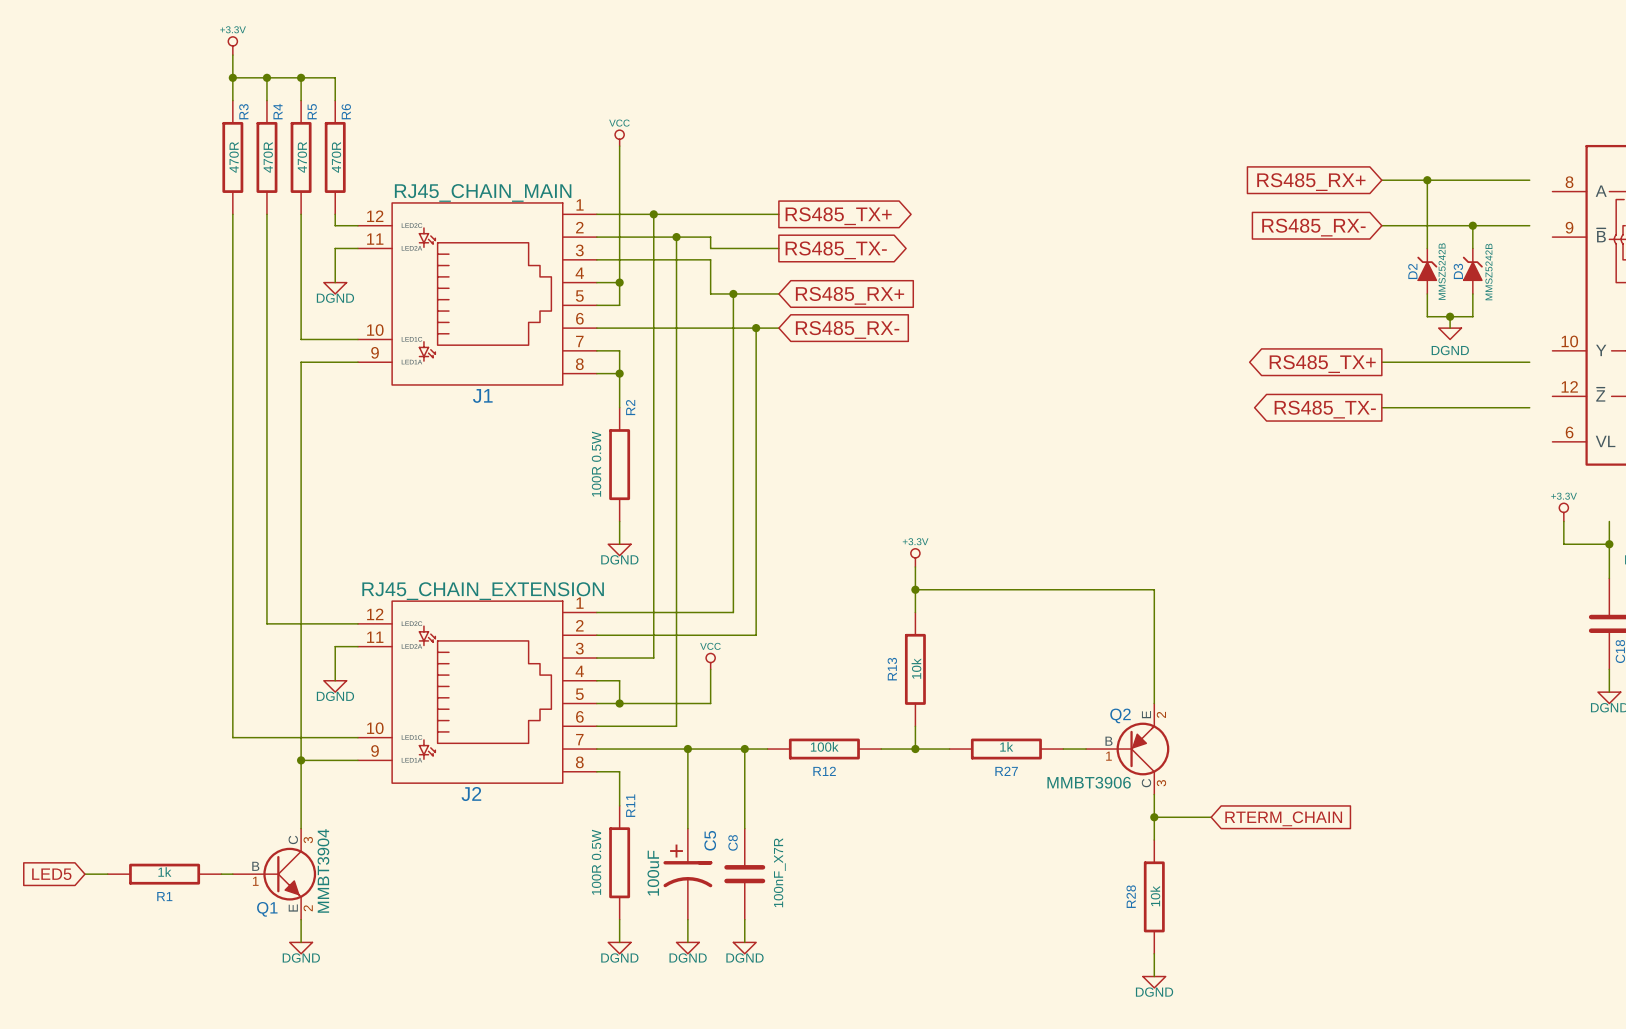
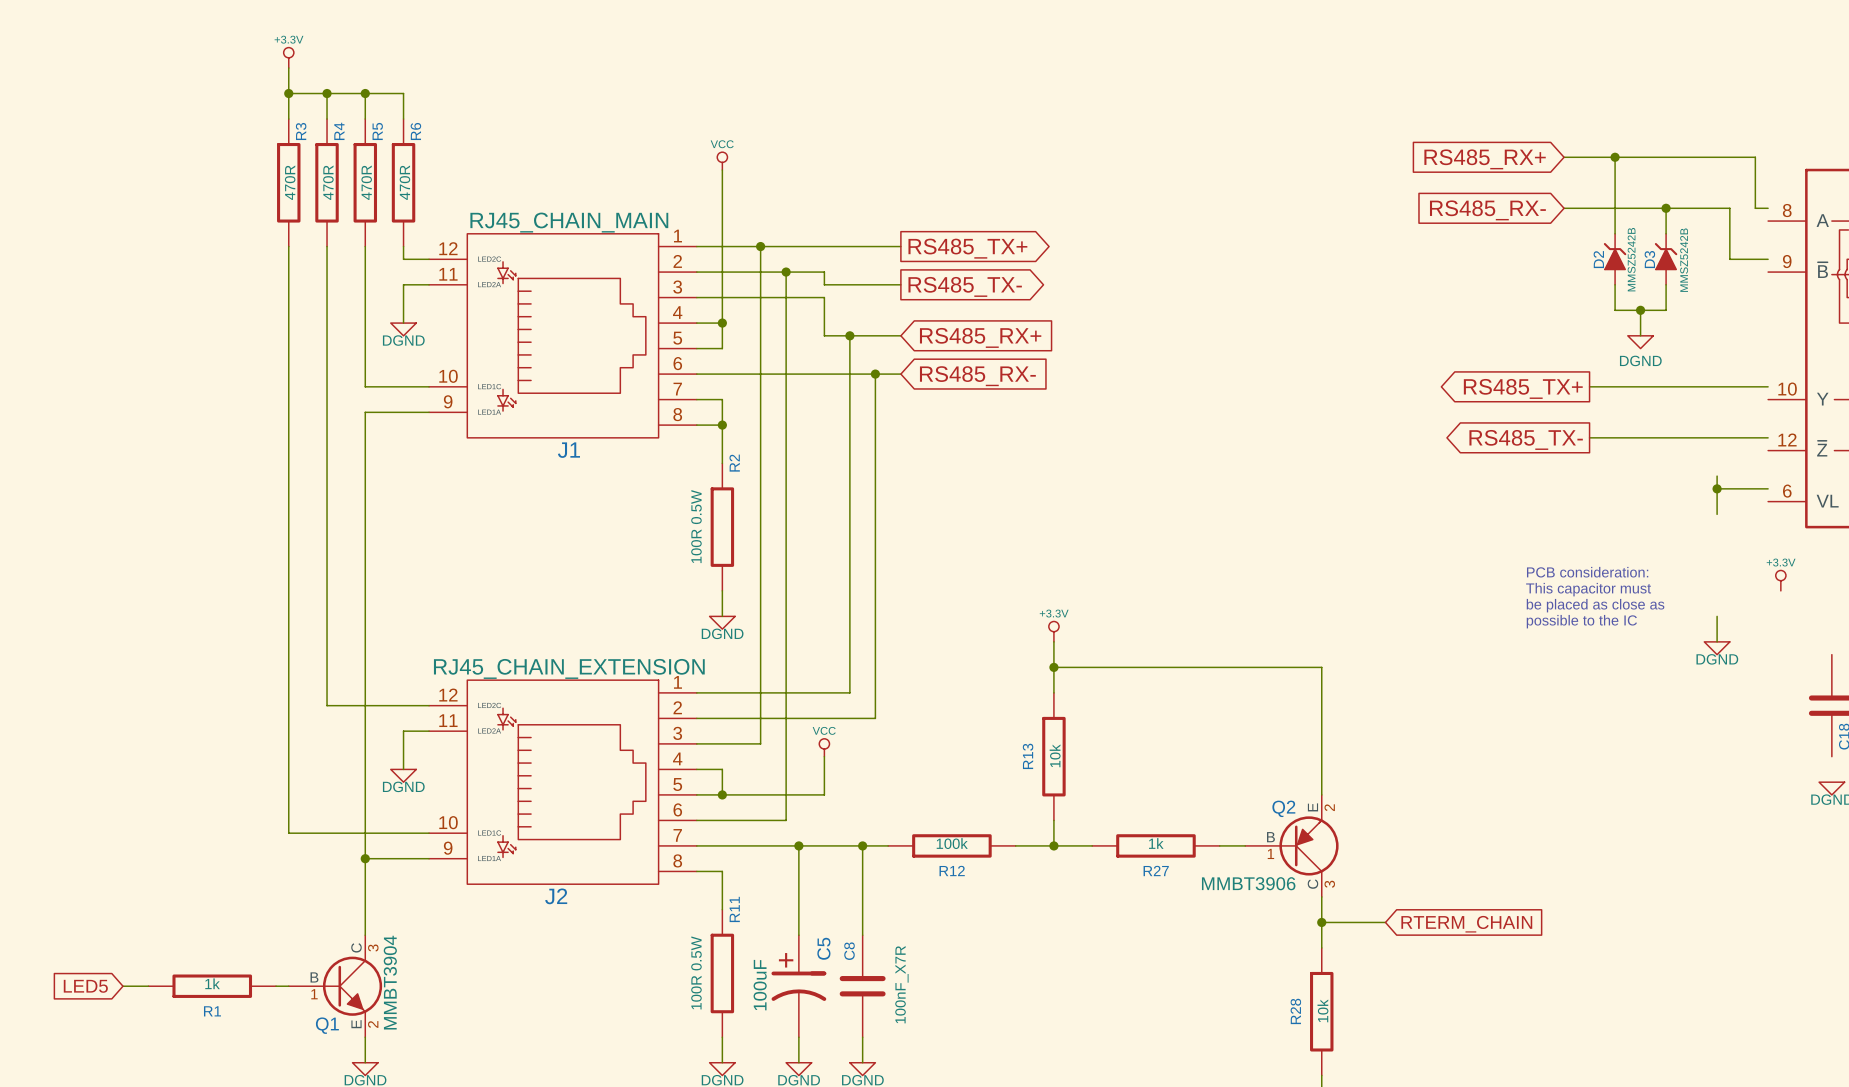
wire: none -> (1564, 157) (1755, 157) (1755, 208) (1768, 208)
junction: none -> (1615, 157)
wire: none -> (1564, 208) (1576, 208)
wire: (1427, 180) (1427, 248) -> (1615, 157) (1615, 233)
junction: (1427, 180) -> none
junction: none -> (1666, 208)
wire: (1518, 180) (1529, 180) -> (1729, 208) (1729, 259)
global label position: RS485_RX+ (1311, 182) -> RS485_RX+ (1485, 159)
wire: (1381, 225) (1518, 225) -> none
wire: (1472, 225) (1472, 248) -> (1666, 208) (1666, 233)
junction: (1472, 225) -> none
wire: none -> (1742, 259) (1768, 259)
global label position: RS485_RX- (1313, 227) -> RS485_RX- (1487, 210)
D2 position: (1427, 271) -> (1615, 259)
wire: none -> (1640, 310) (1640, 335)
junction: none -> (1640, 310)
D3 position: (1472, 271) -> (1666, 259)
wire: (1427, 293) (1427, 316) (1472, 316) (1472, 293) -> (1615, 284) (1615, 310) (1666, 310) (1666, 284)
wire: (1450, 316) (1450, 328) -> none
junction: (1450, 316) -> none
power symbol position: DGND (1450, 333) -> DGND (1640, 342)
wire: none -> (1589, 386) (1768, 386)
wire: (1381, 362) (1529, 362) -> none
global label position: RS485_TX+ (1322, 364) -> RS485_TX+ (1523, 388)
wire: none -> (1589, 437) (1768, 437)
wire: (1381, 407) (1529, 407) -> none
global label position: RS485_TX- (1325, 409) -> RS485_TX- (1526, 439)
wire: none -> (1717, 476) (1717, 514)
wire: none -> (1717, 488) (1768, 488)
junction: none -> (1717, 488)
text: none -> PCB consideration: (1587, 572)
text: none -> This capacitor must (1588, 589)
wire: (1563, 521) (1563, 544) (1609, 544) -> none
wire: (1609, 521) (1609, 578) -> none
text: none -> be placed as close as (1595, 605)
junction: (1609, 544) -> none
text: none -> possible to the IC (1581, 621)
power symbol: none -> DGND (1717, 648)
wire: (1609, 669) (1609, 692) -> (1717, 616) (1717, 641)

